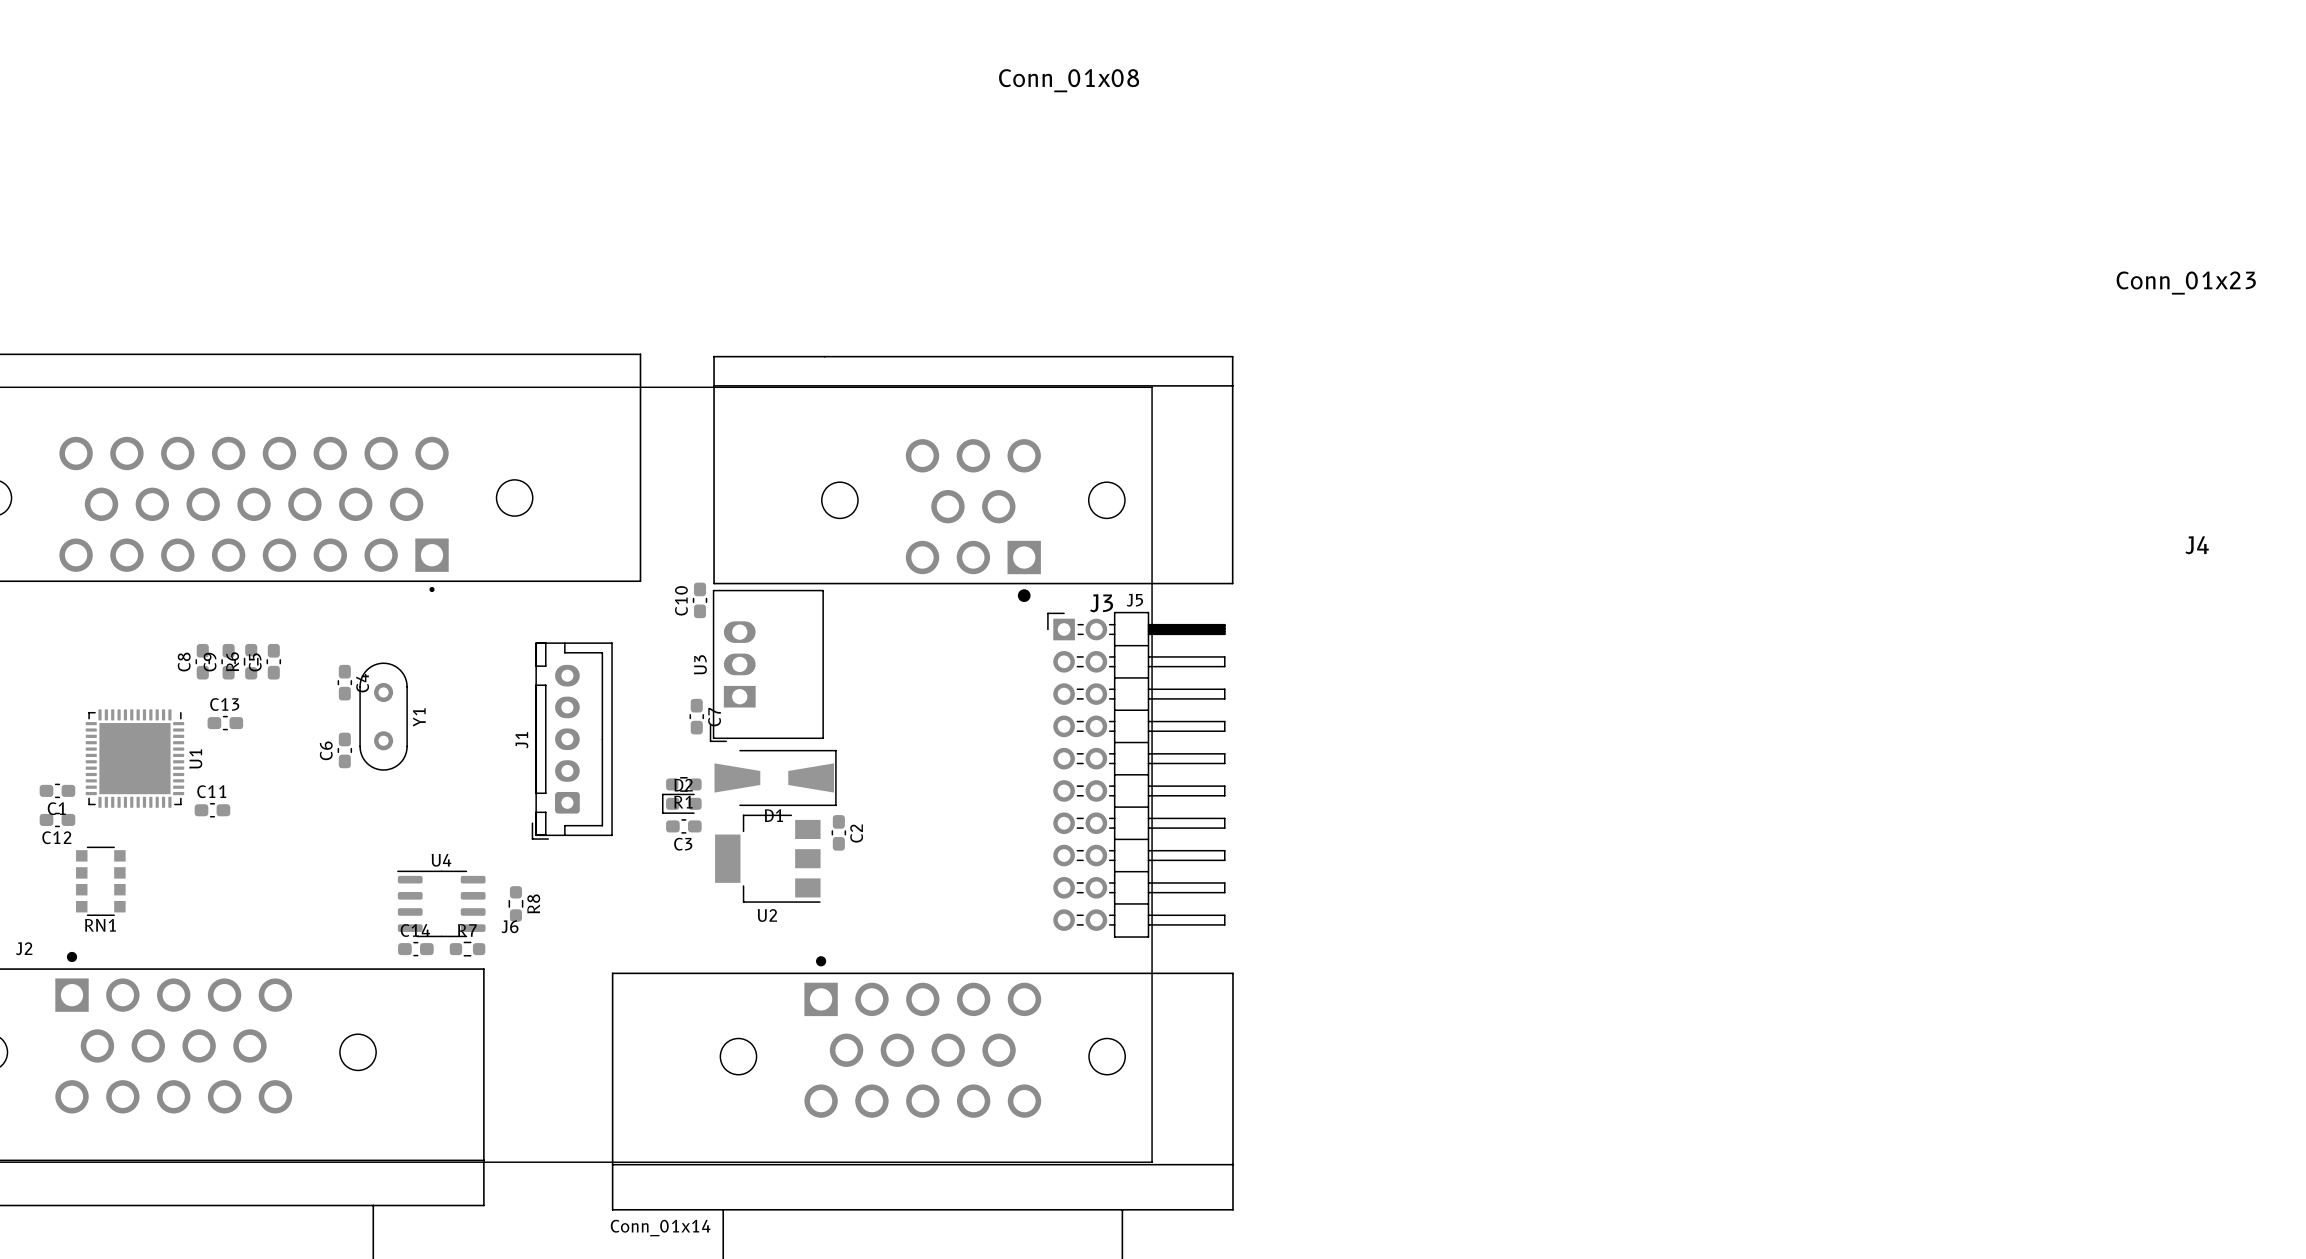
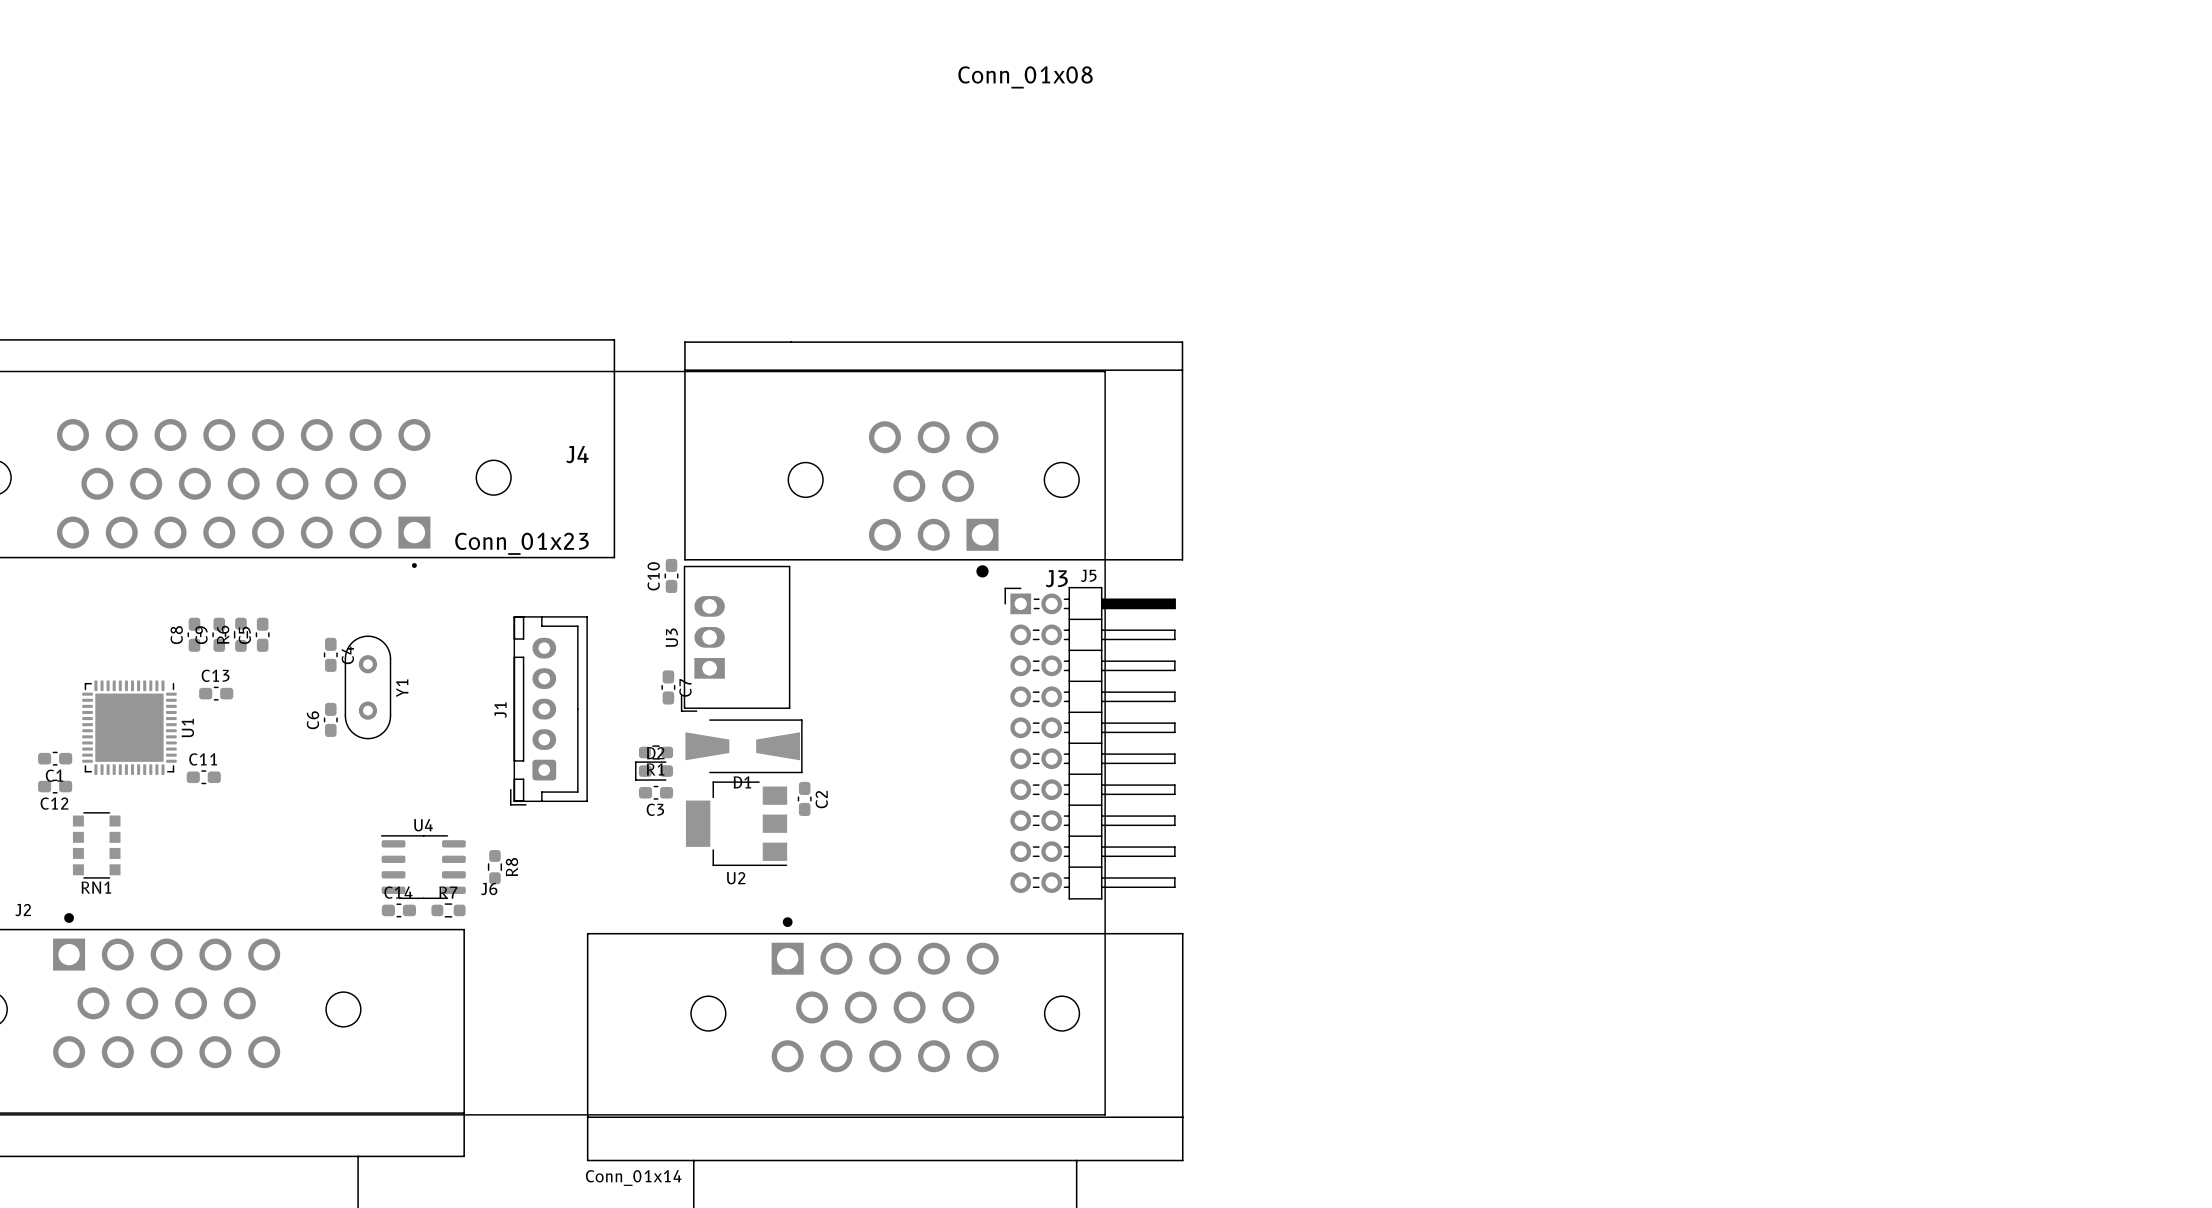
J4 value position: Conn_01x23 (2186, 283) -> Conn_01x23 (521, 543)
J4 name position: J4 (2197, 545) -> J4 (577, 454)

